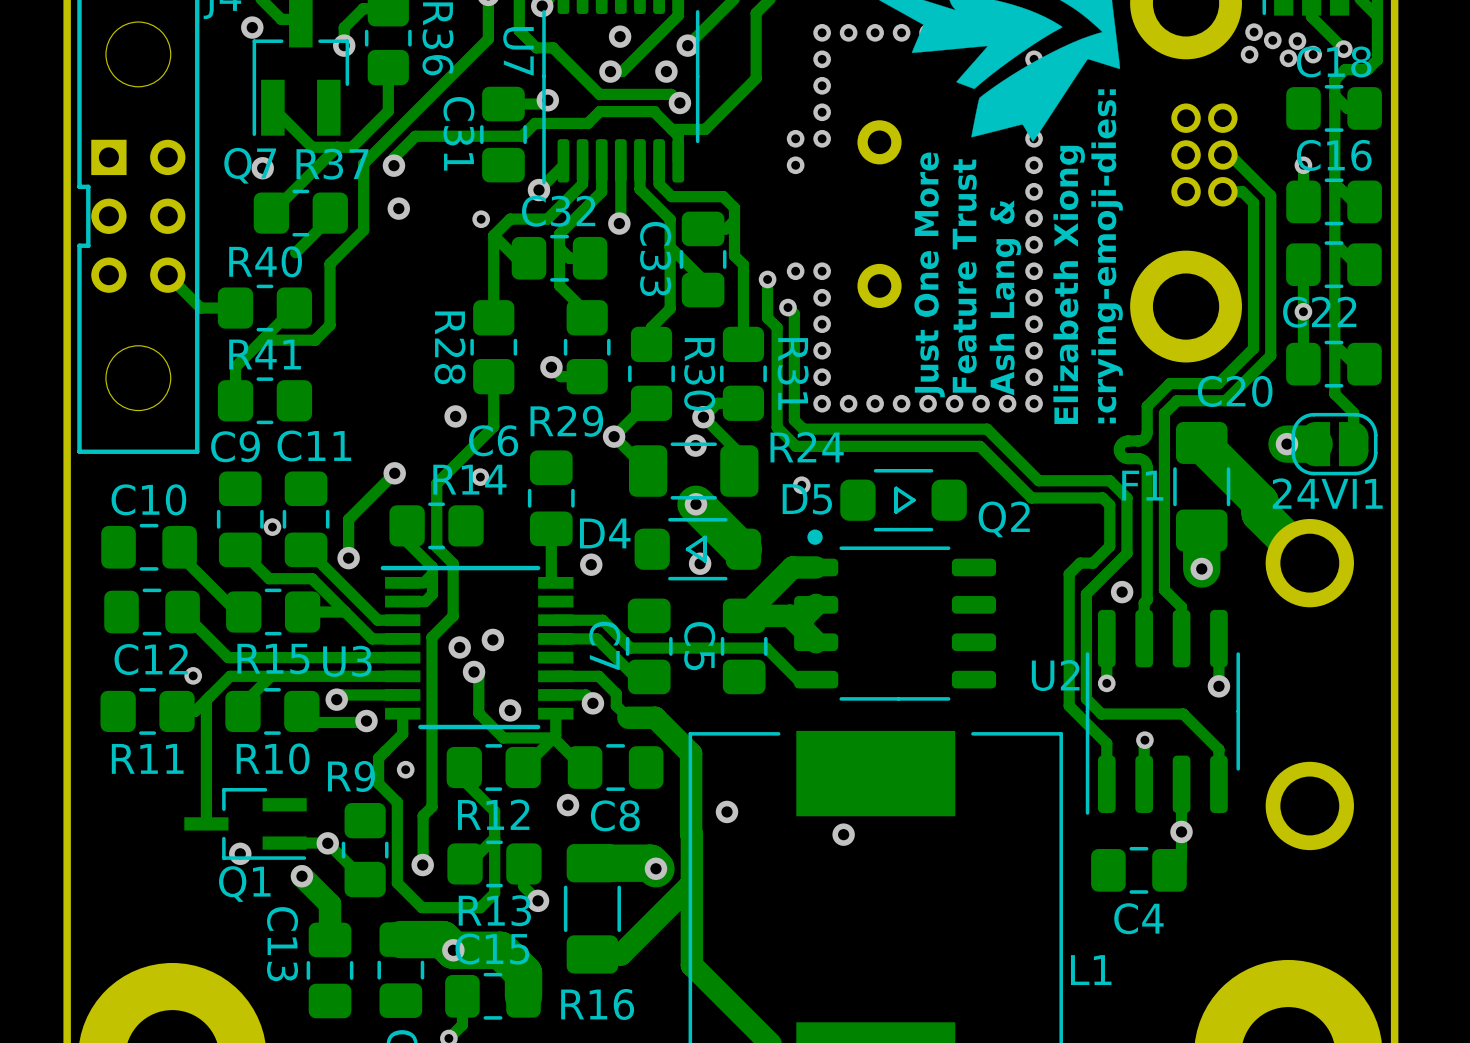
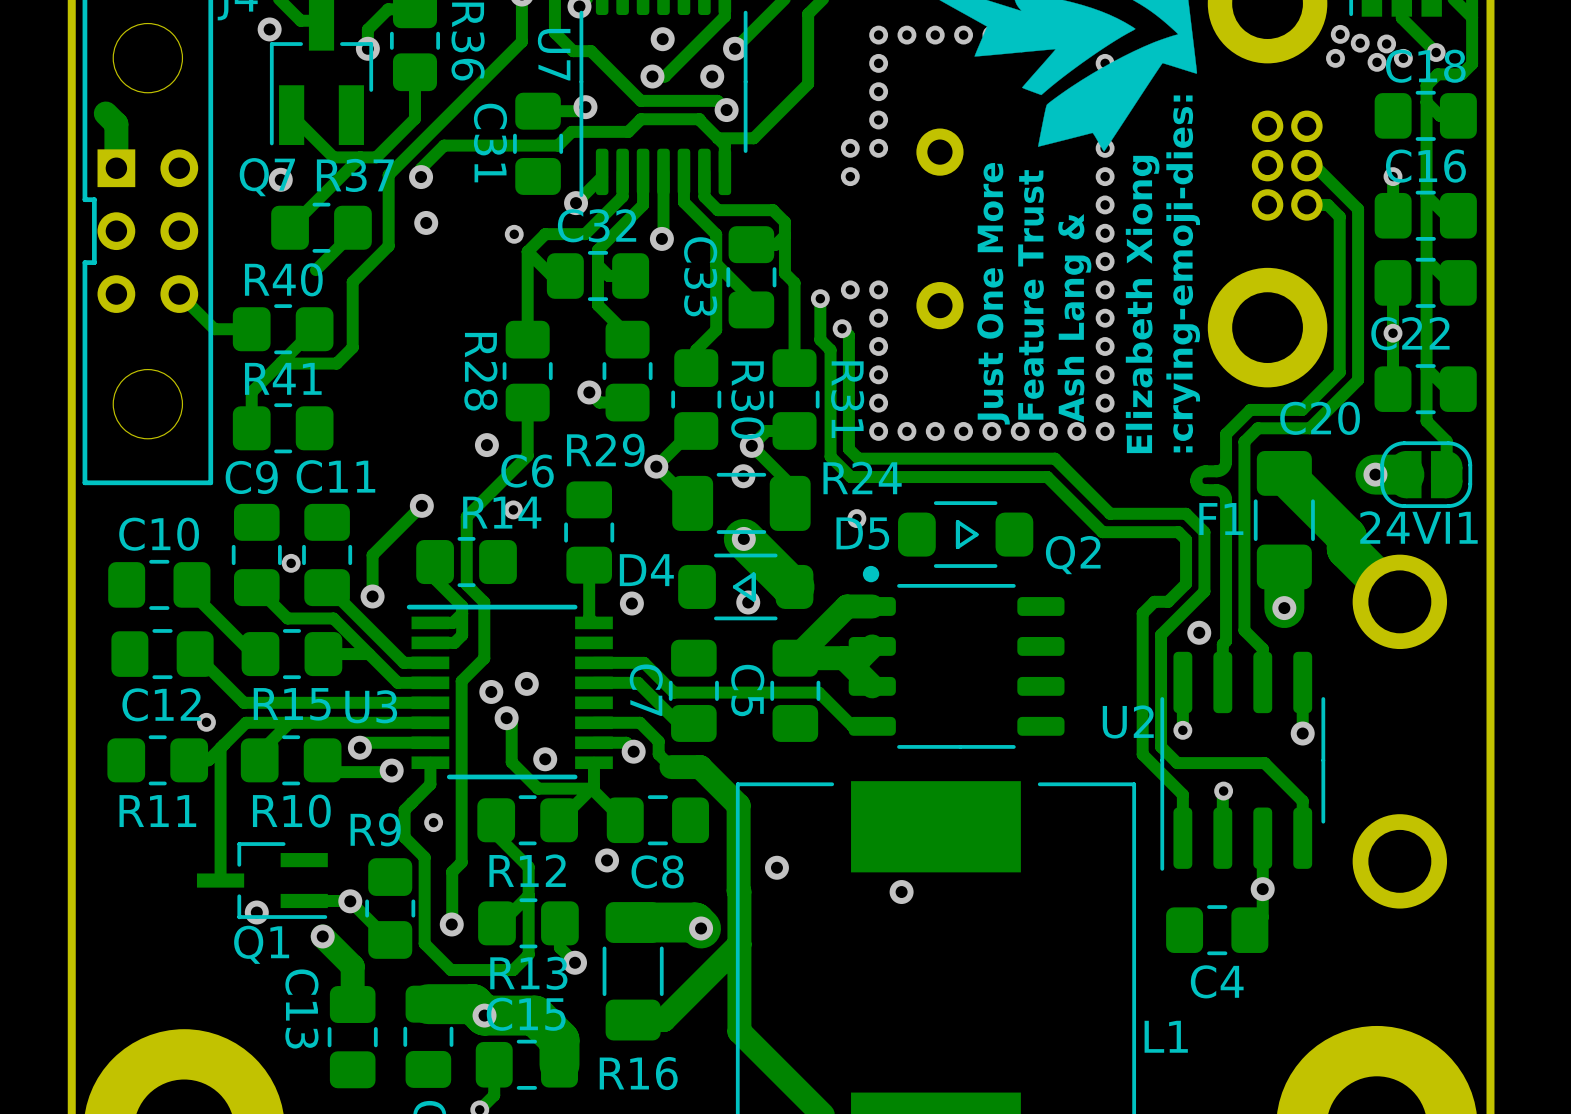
track: none -> (105, 113) (116, 124) (116, 168)

